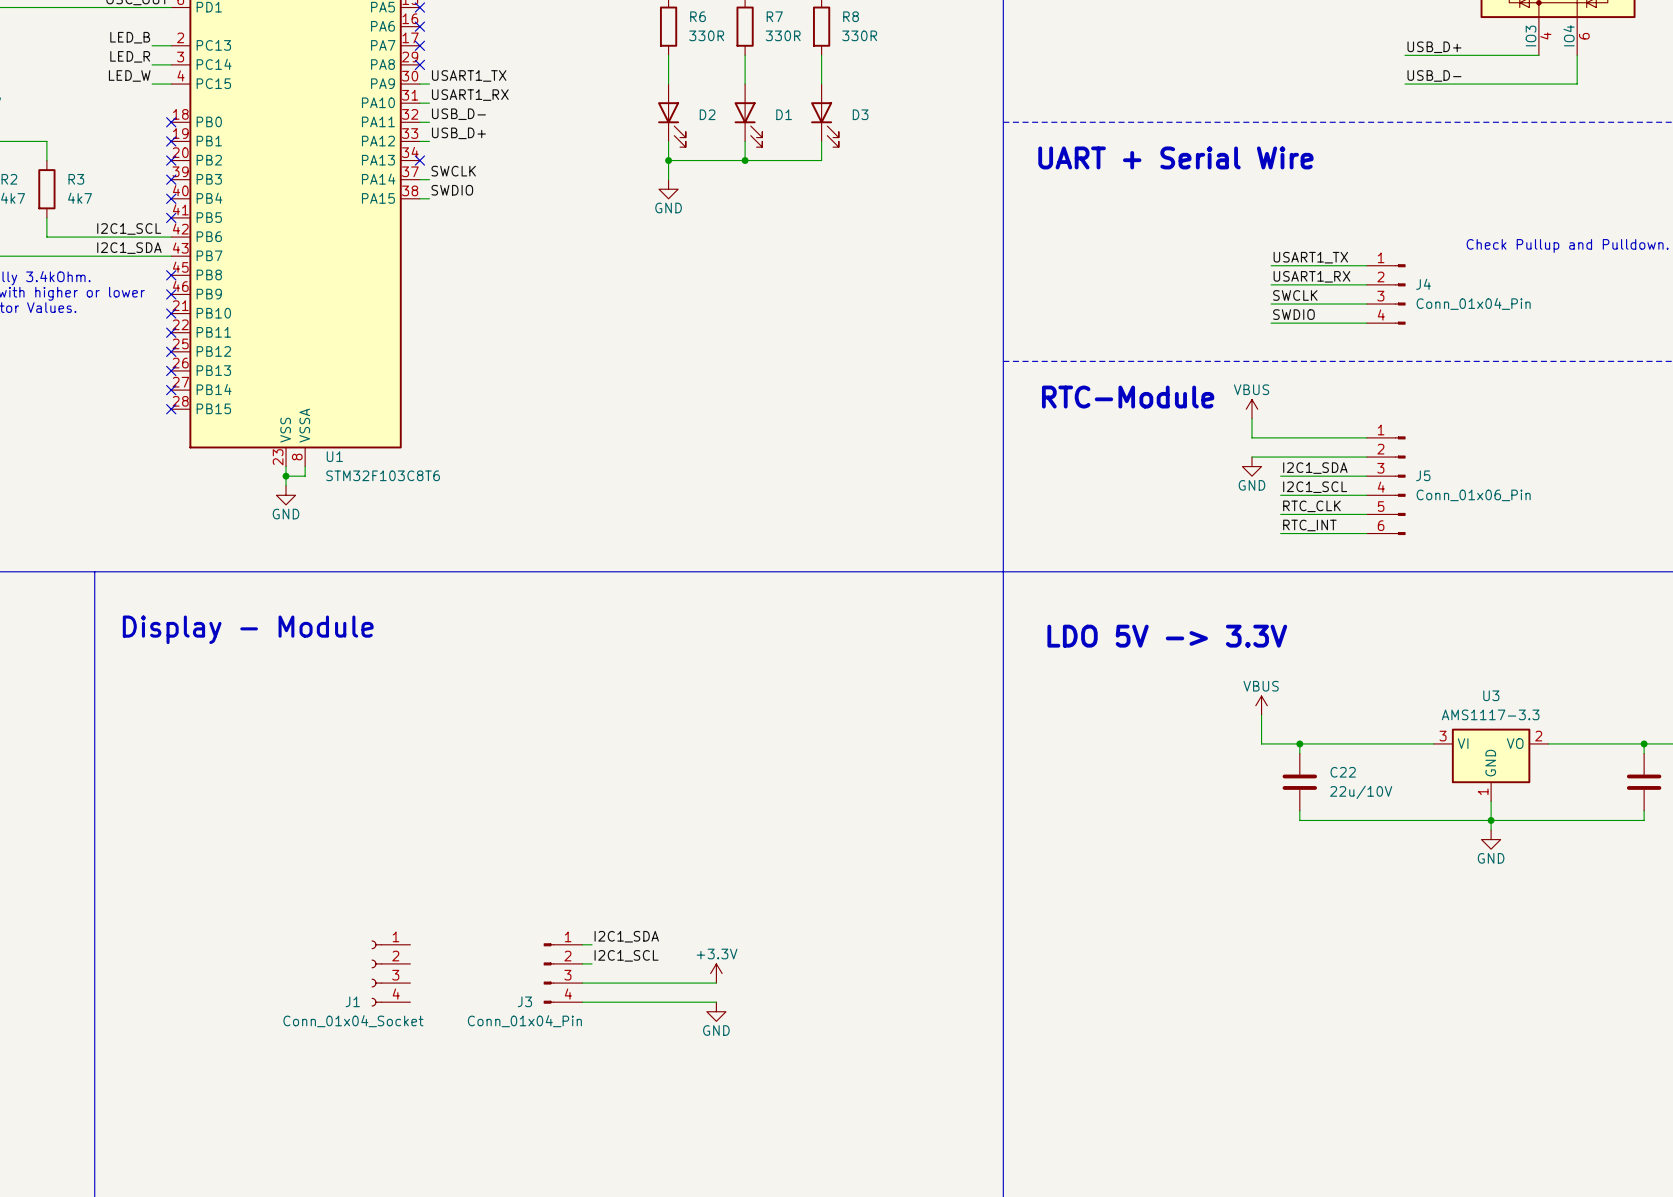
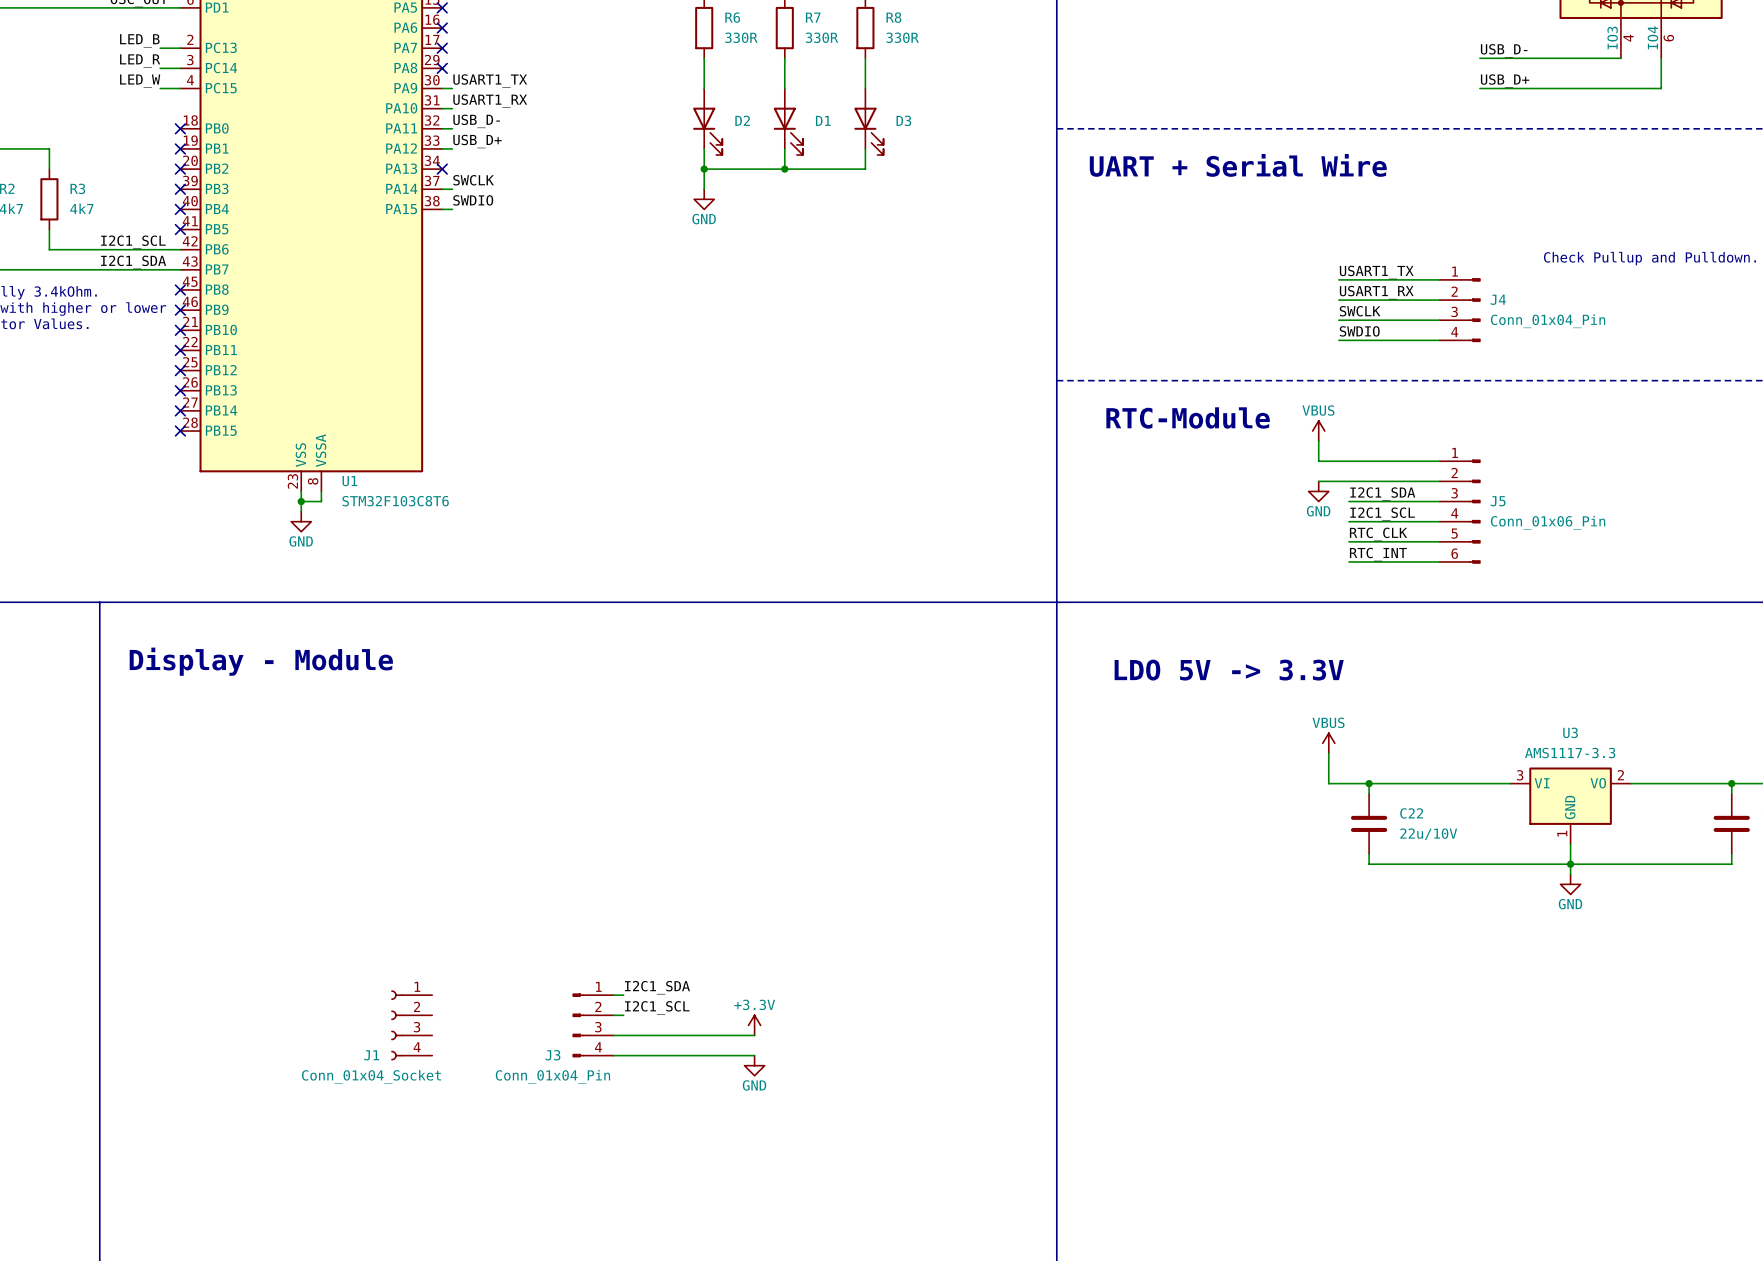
label: USB_D+ (1434, 47) -> USB_D- (1504, 50)
label: USB_D- (1434, 75) -> USB_D+ (1505, 81)

